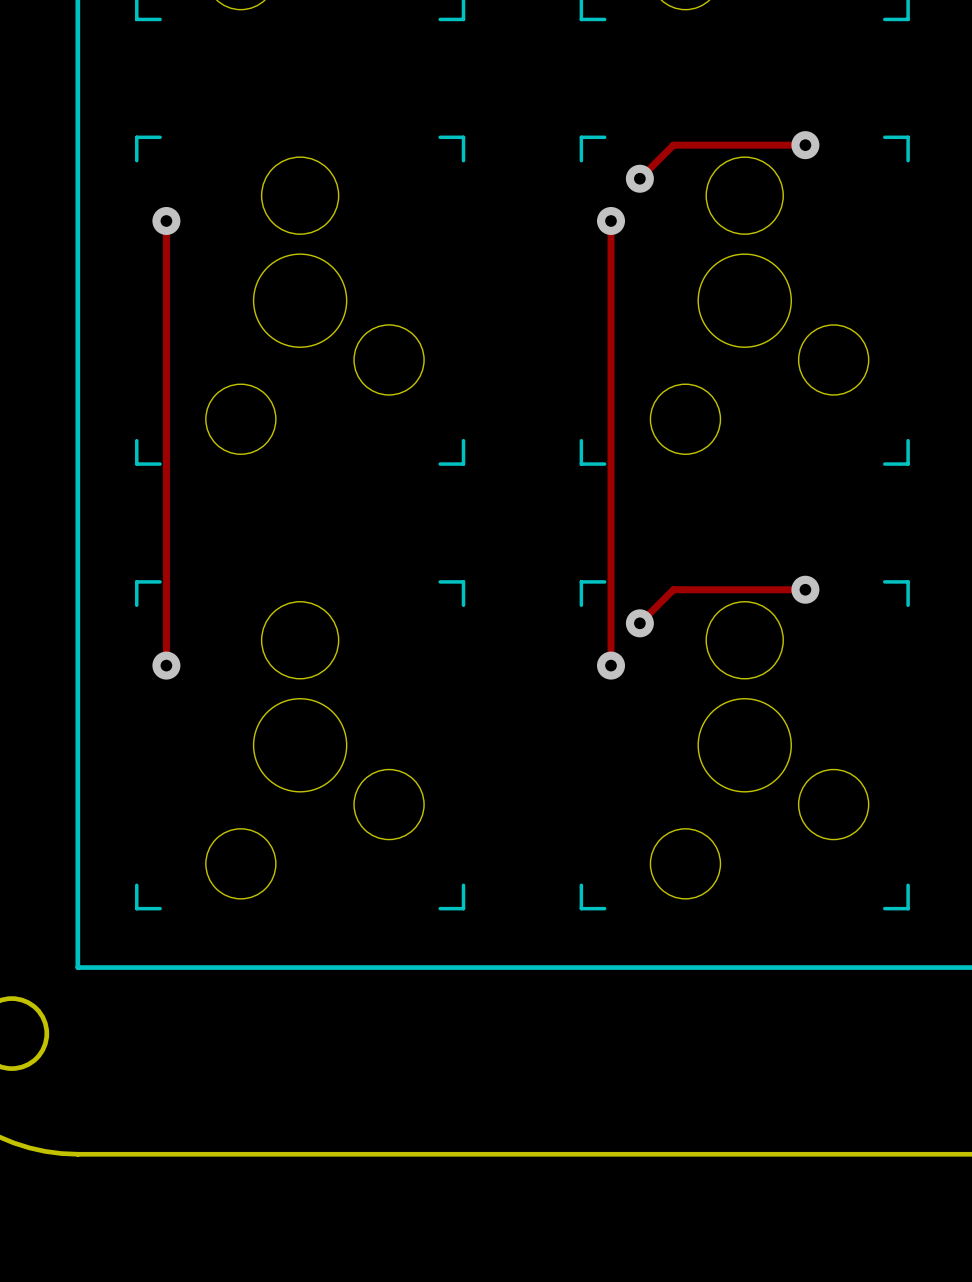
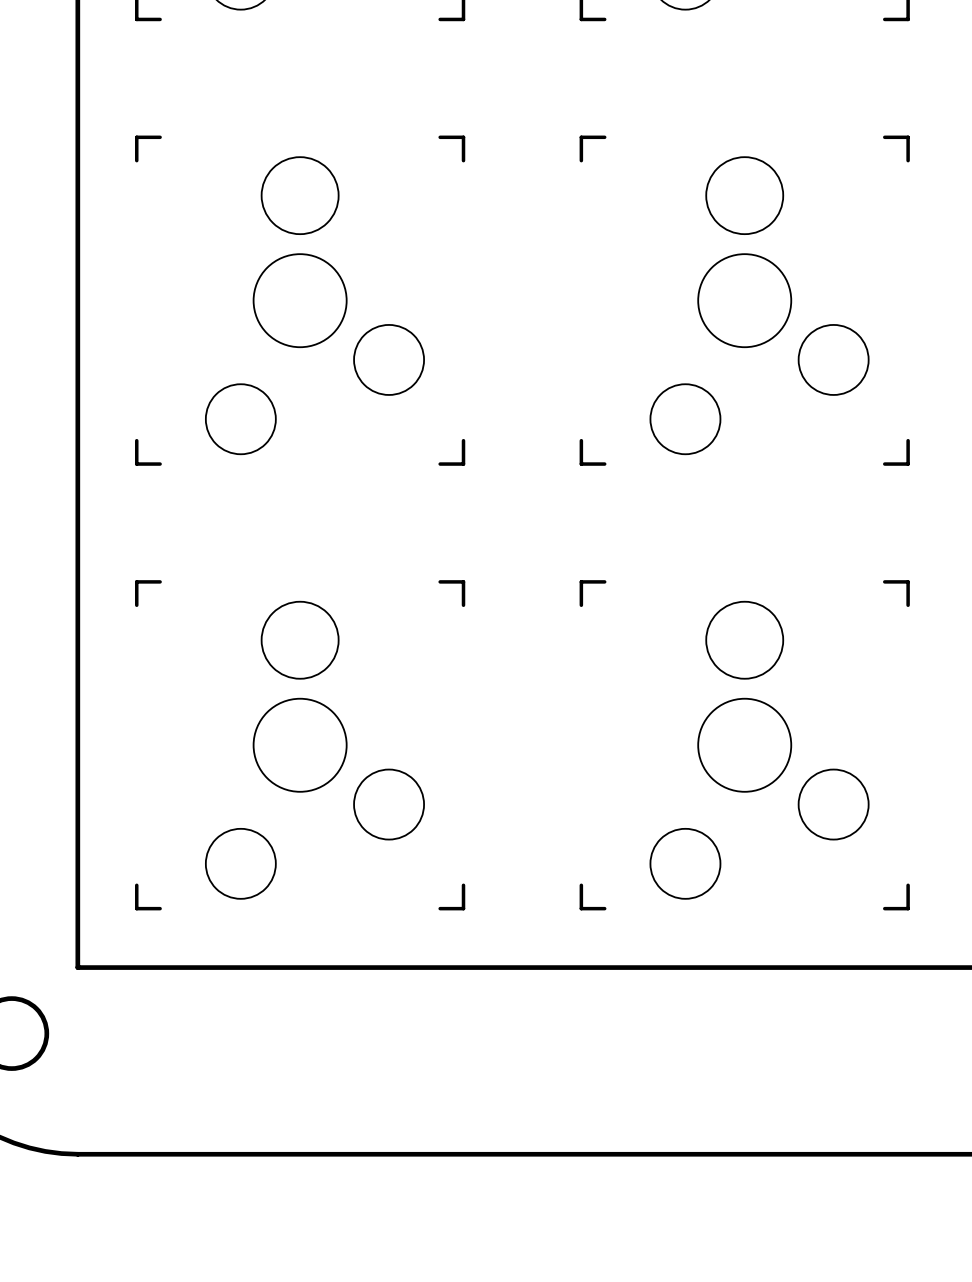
track: (805, 145) (673, 145) (639, 178) -> none
via: (805, 145) -> none
via: (639, 178) -> none
track: (166, 220) (166, 665) -> none
via: (166, 220) -> none
track: (611, 220) (611, 665) -> none
via: (611, 220) -> none
track: (805, 589) (673, 589) (639, 623) -> none
via: (805, 589) -> none
via: (639, 623) -> none
via: (166, 665) -> none
via: (611, 665) -> none

